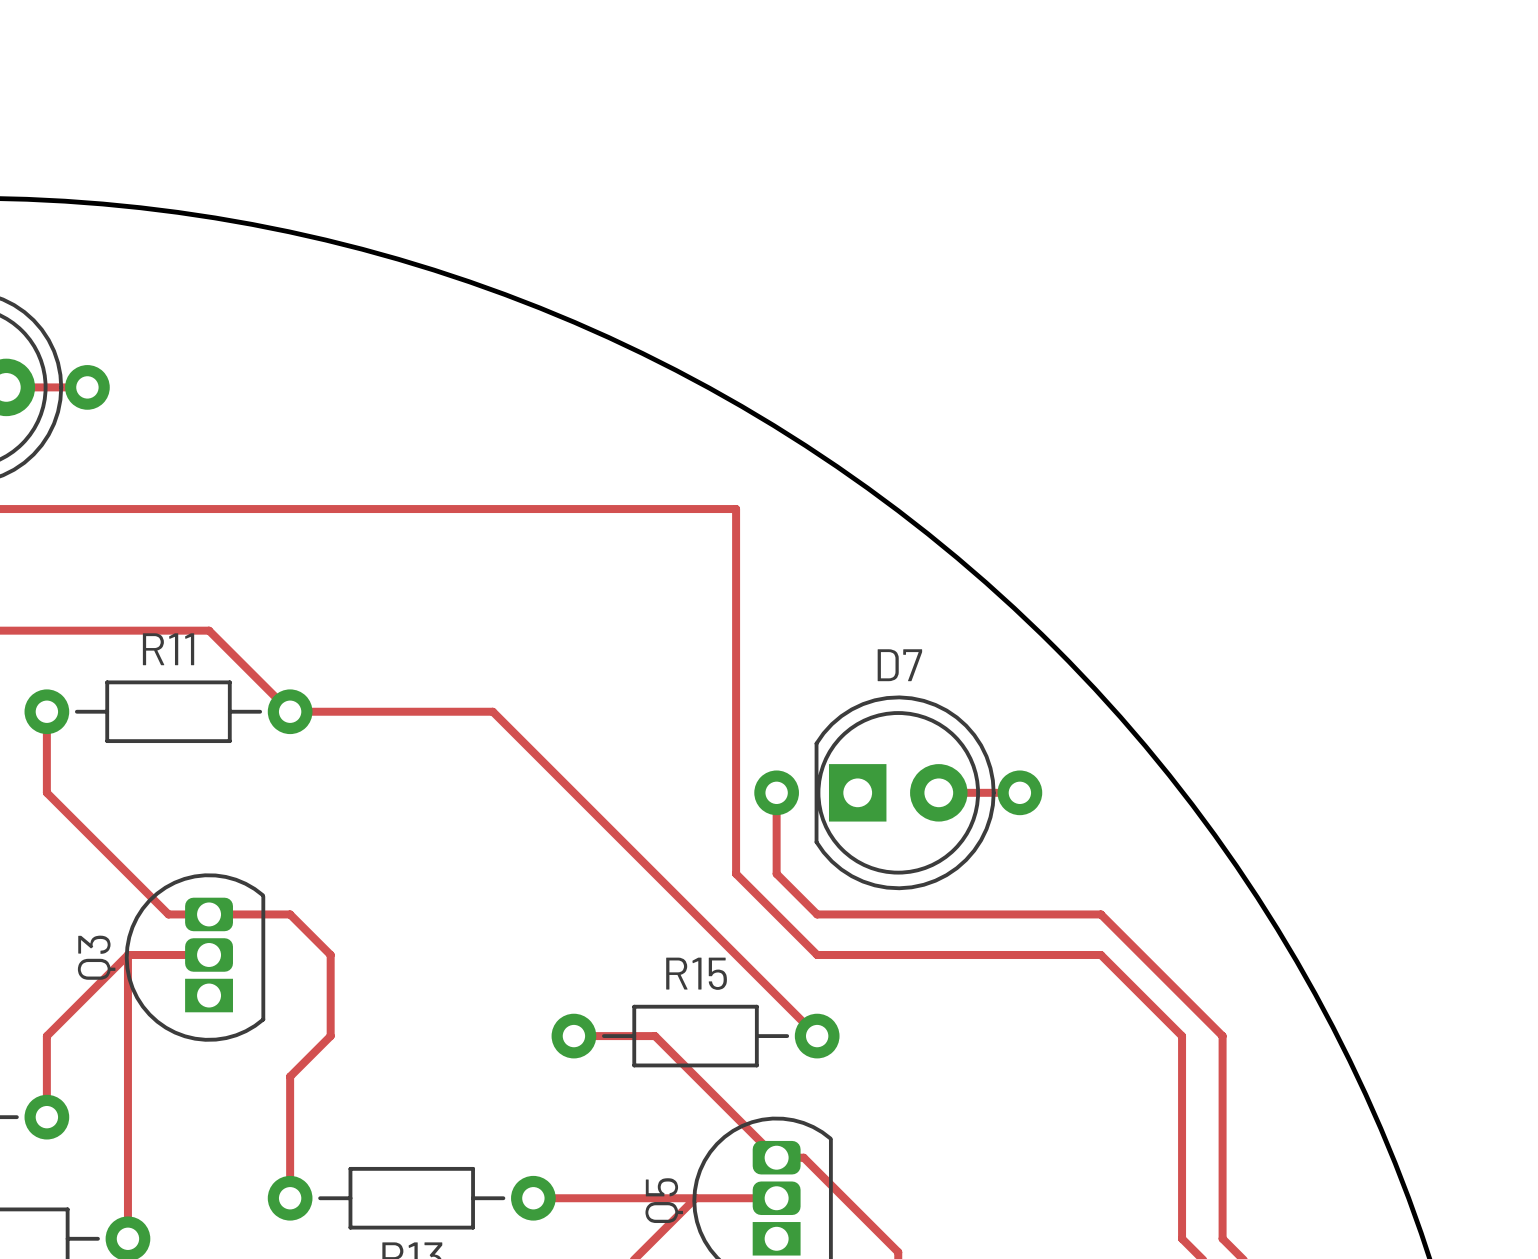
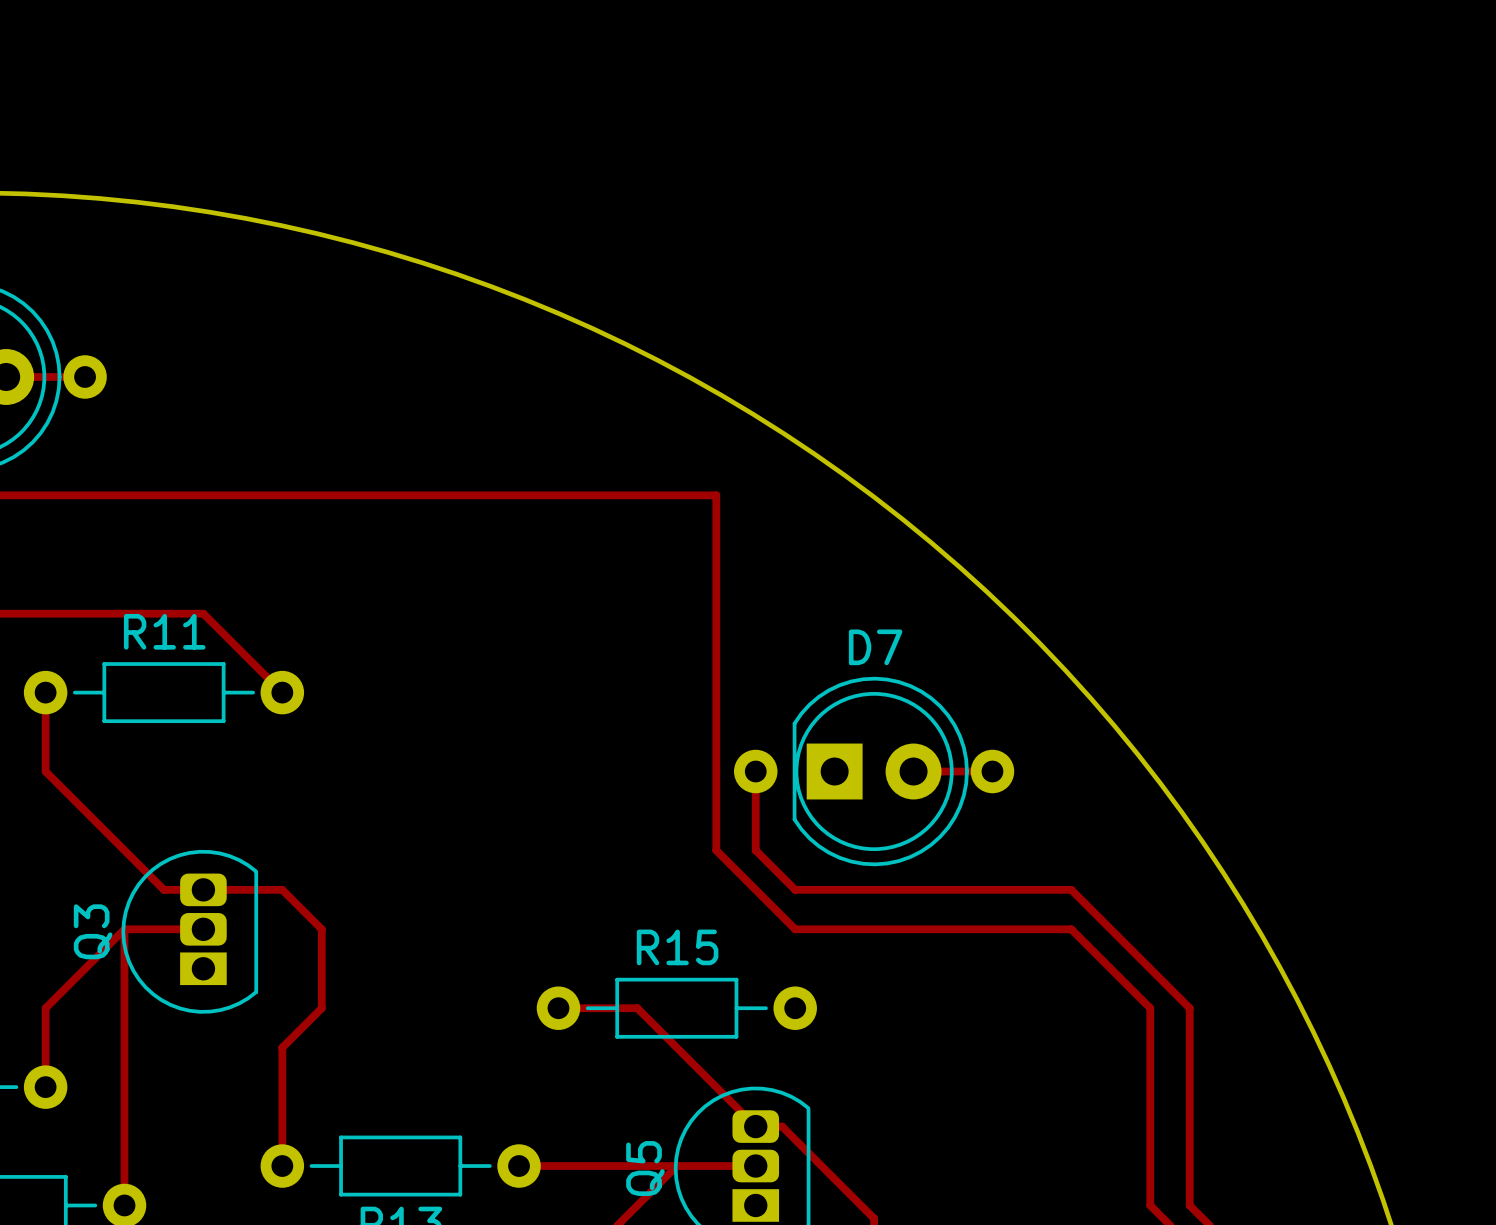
track: (290, 711) (492, 711) (817, 1036) -> none

